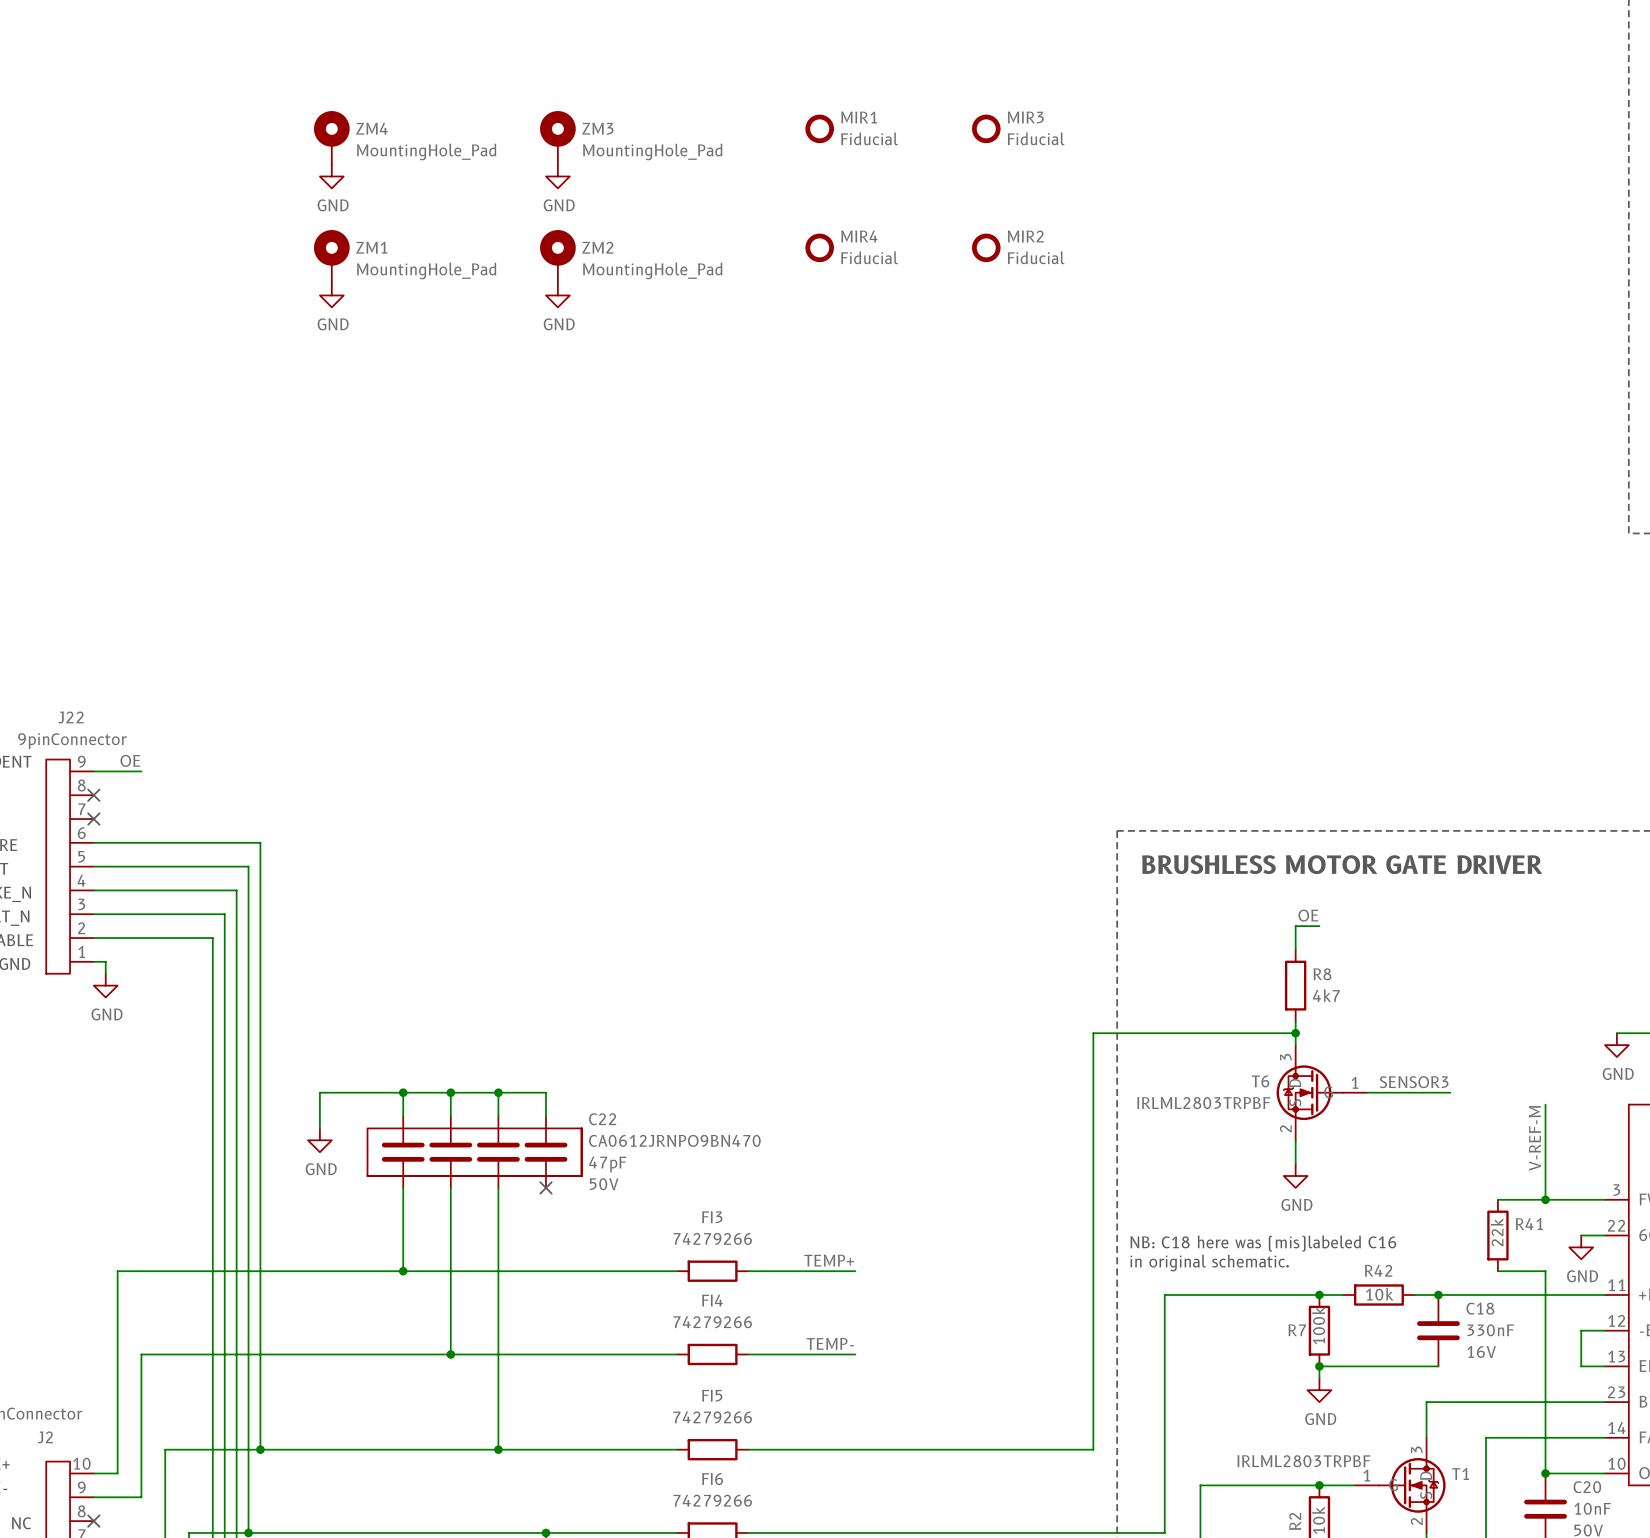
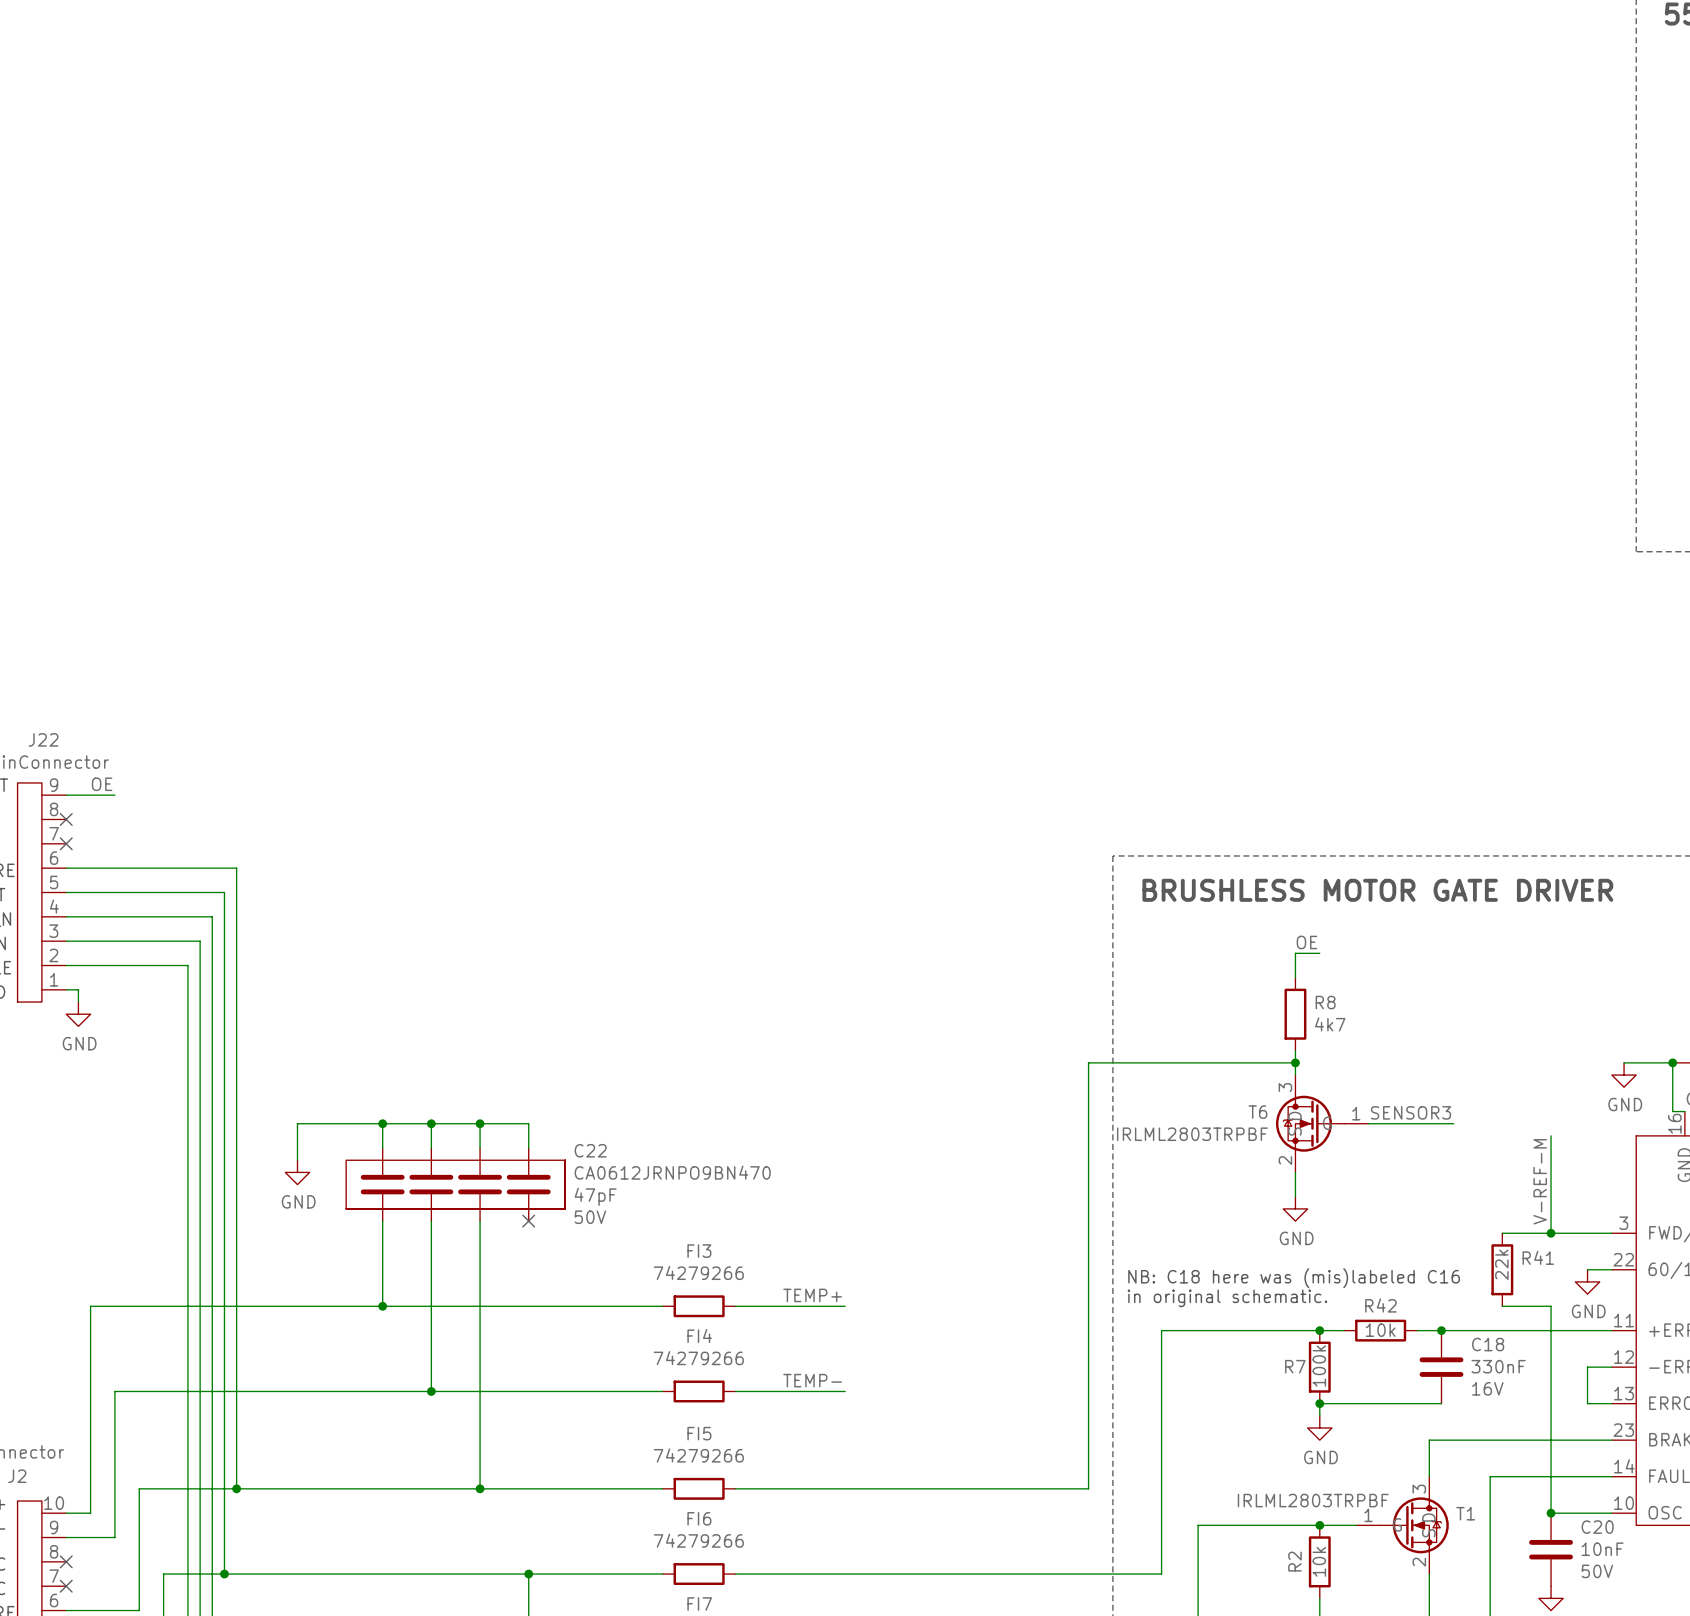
MIR1: Fiducial (819, 128) -> none
MIR3: Fiducial (986, 128) -> none
ZM4: MountingHole_Pad (331, 137) -> none
ZM3: MountingHole_Pad (557, 137) -> none
power symbol: GND (331, 176) -> none
power symbol: GND (557, 176) -> none
MIR4: Fiducial (819, 247) -> none
MIR2: Fiducial (986, 247) -> none
ZM1: MountingHole_Pad (331, 256) -> none
ZM2: MountingHole_Pad (557, 256) -> none
power symbol: GND (331, 295) -> none
power symbol: GND (557, 295) -> none

